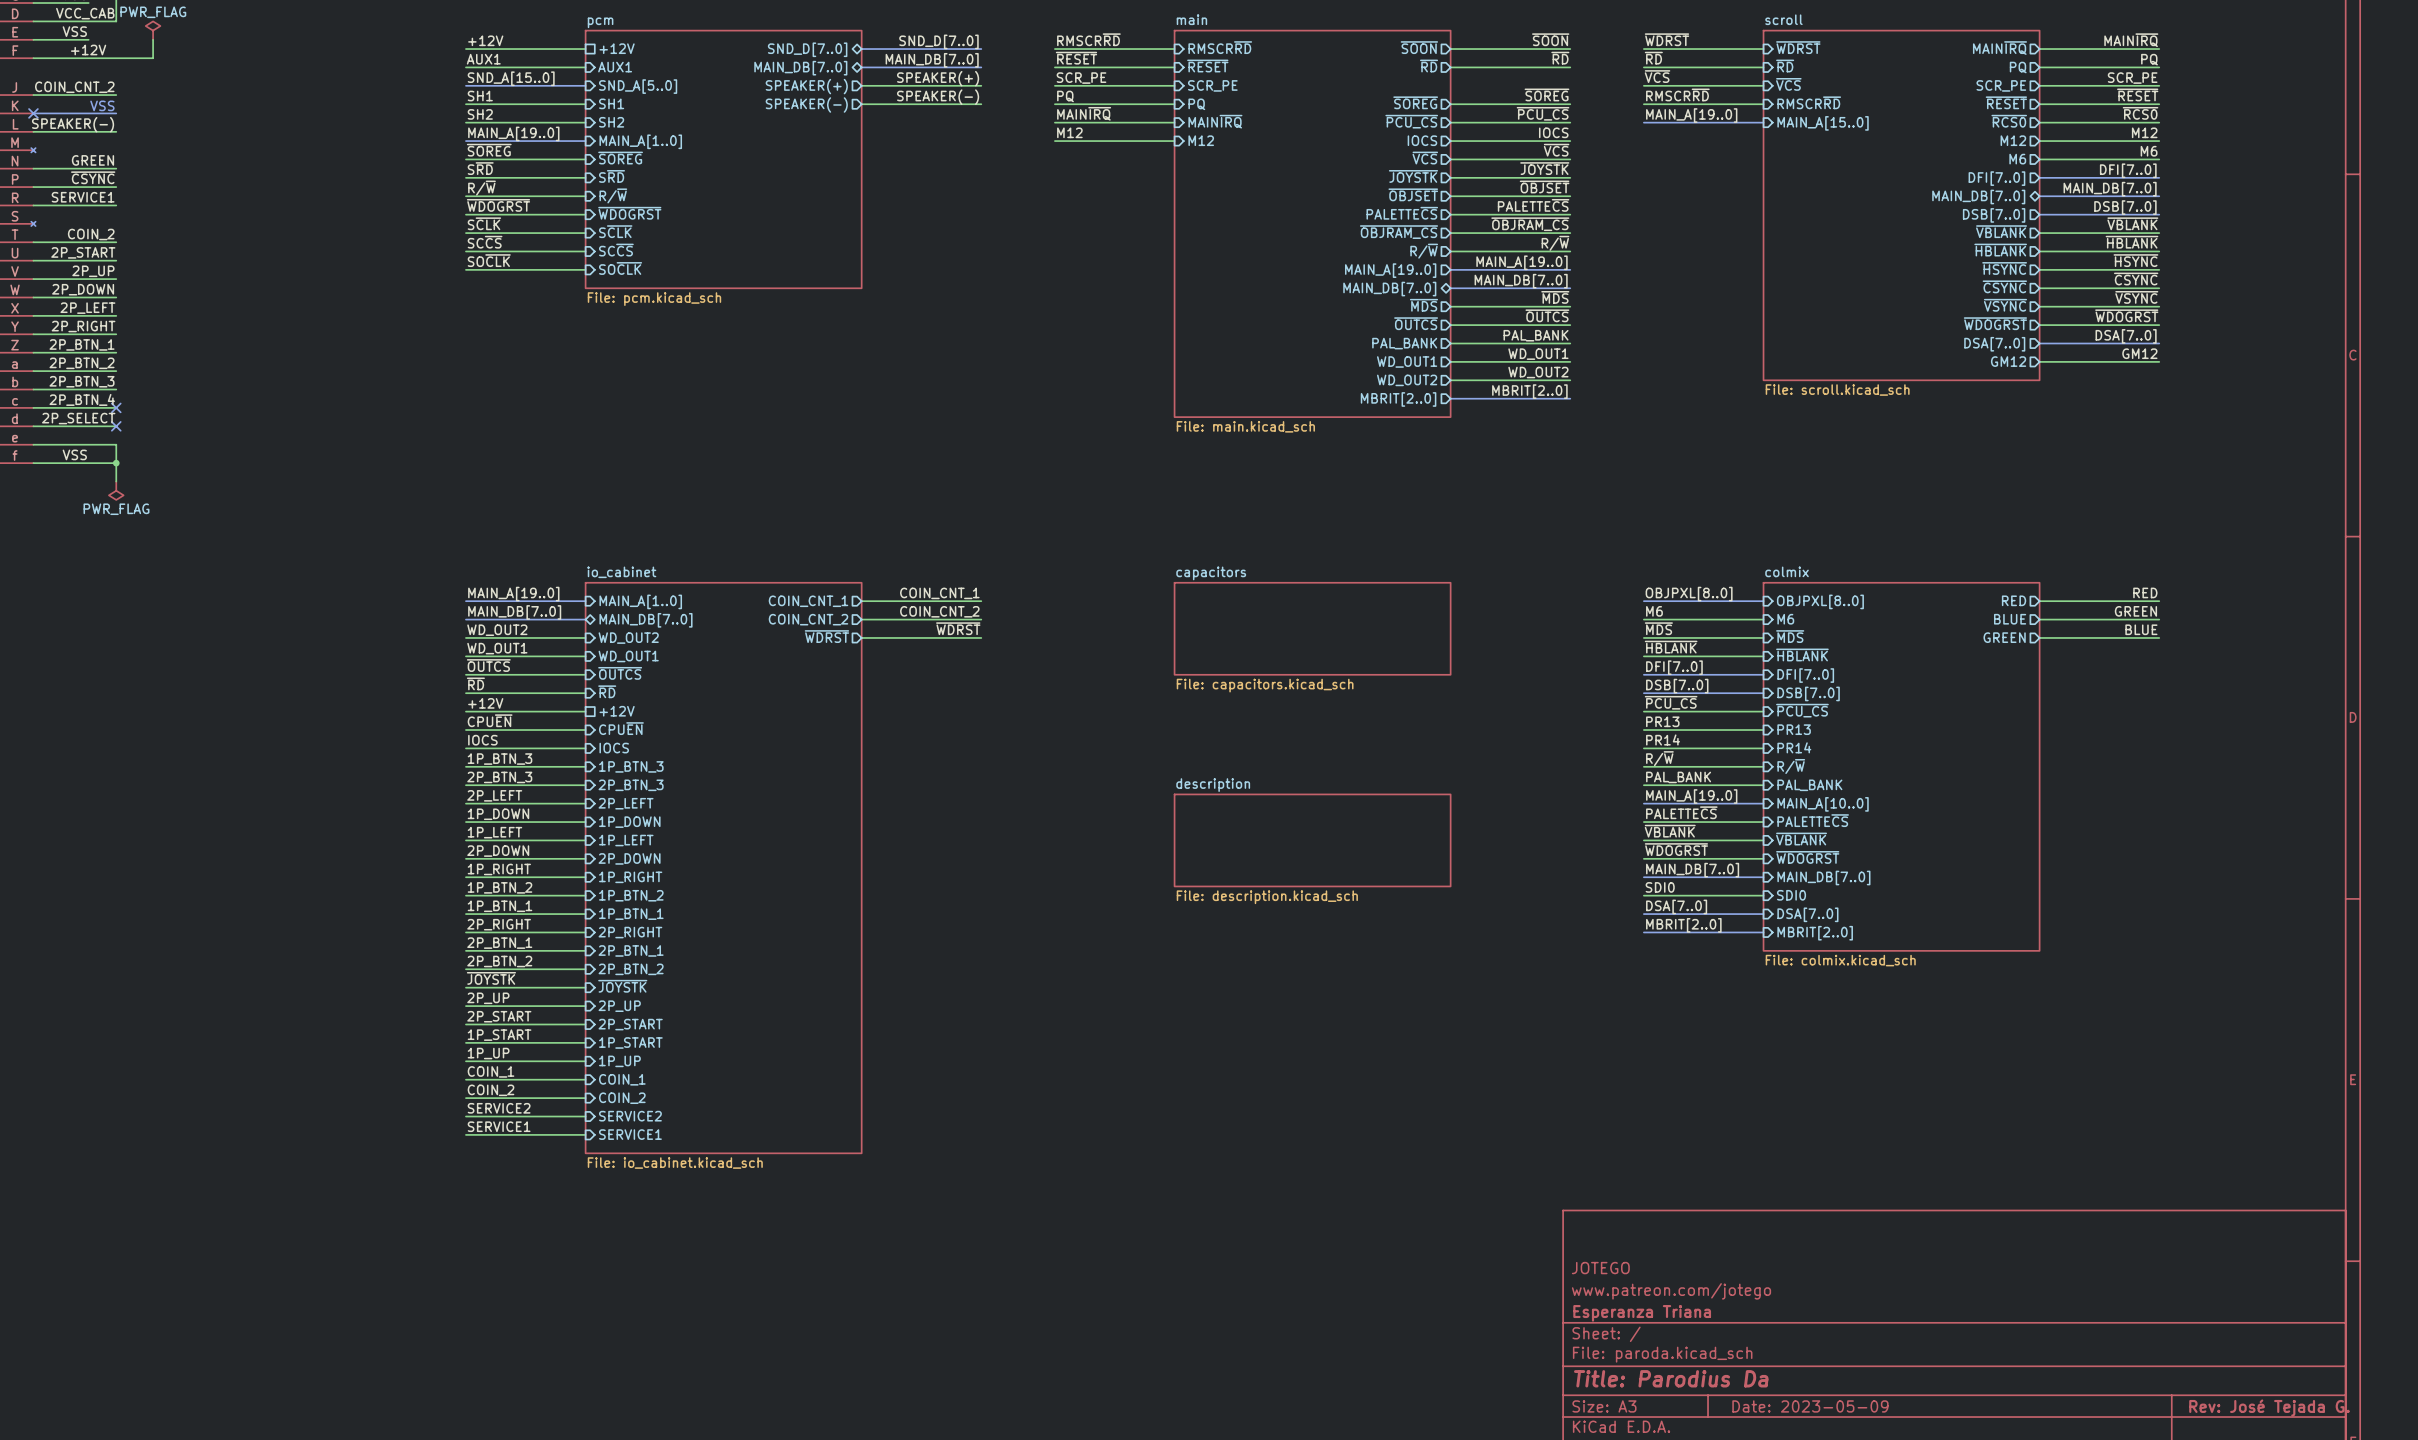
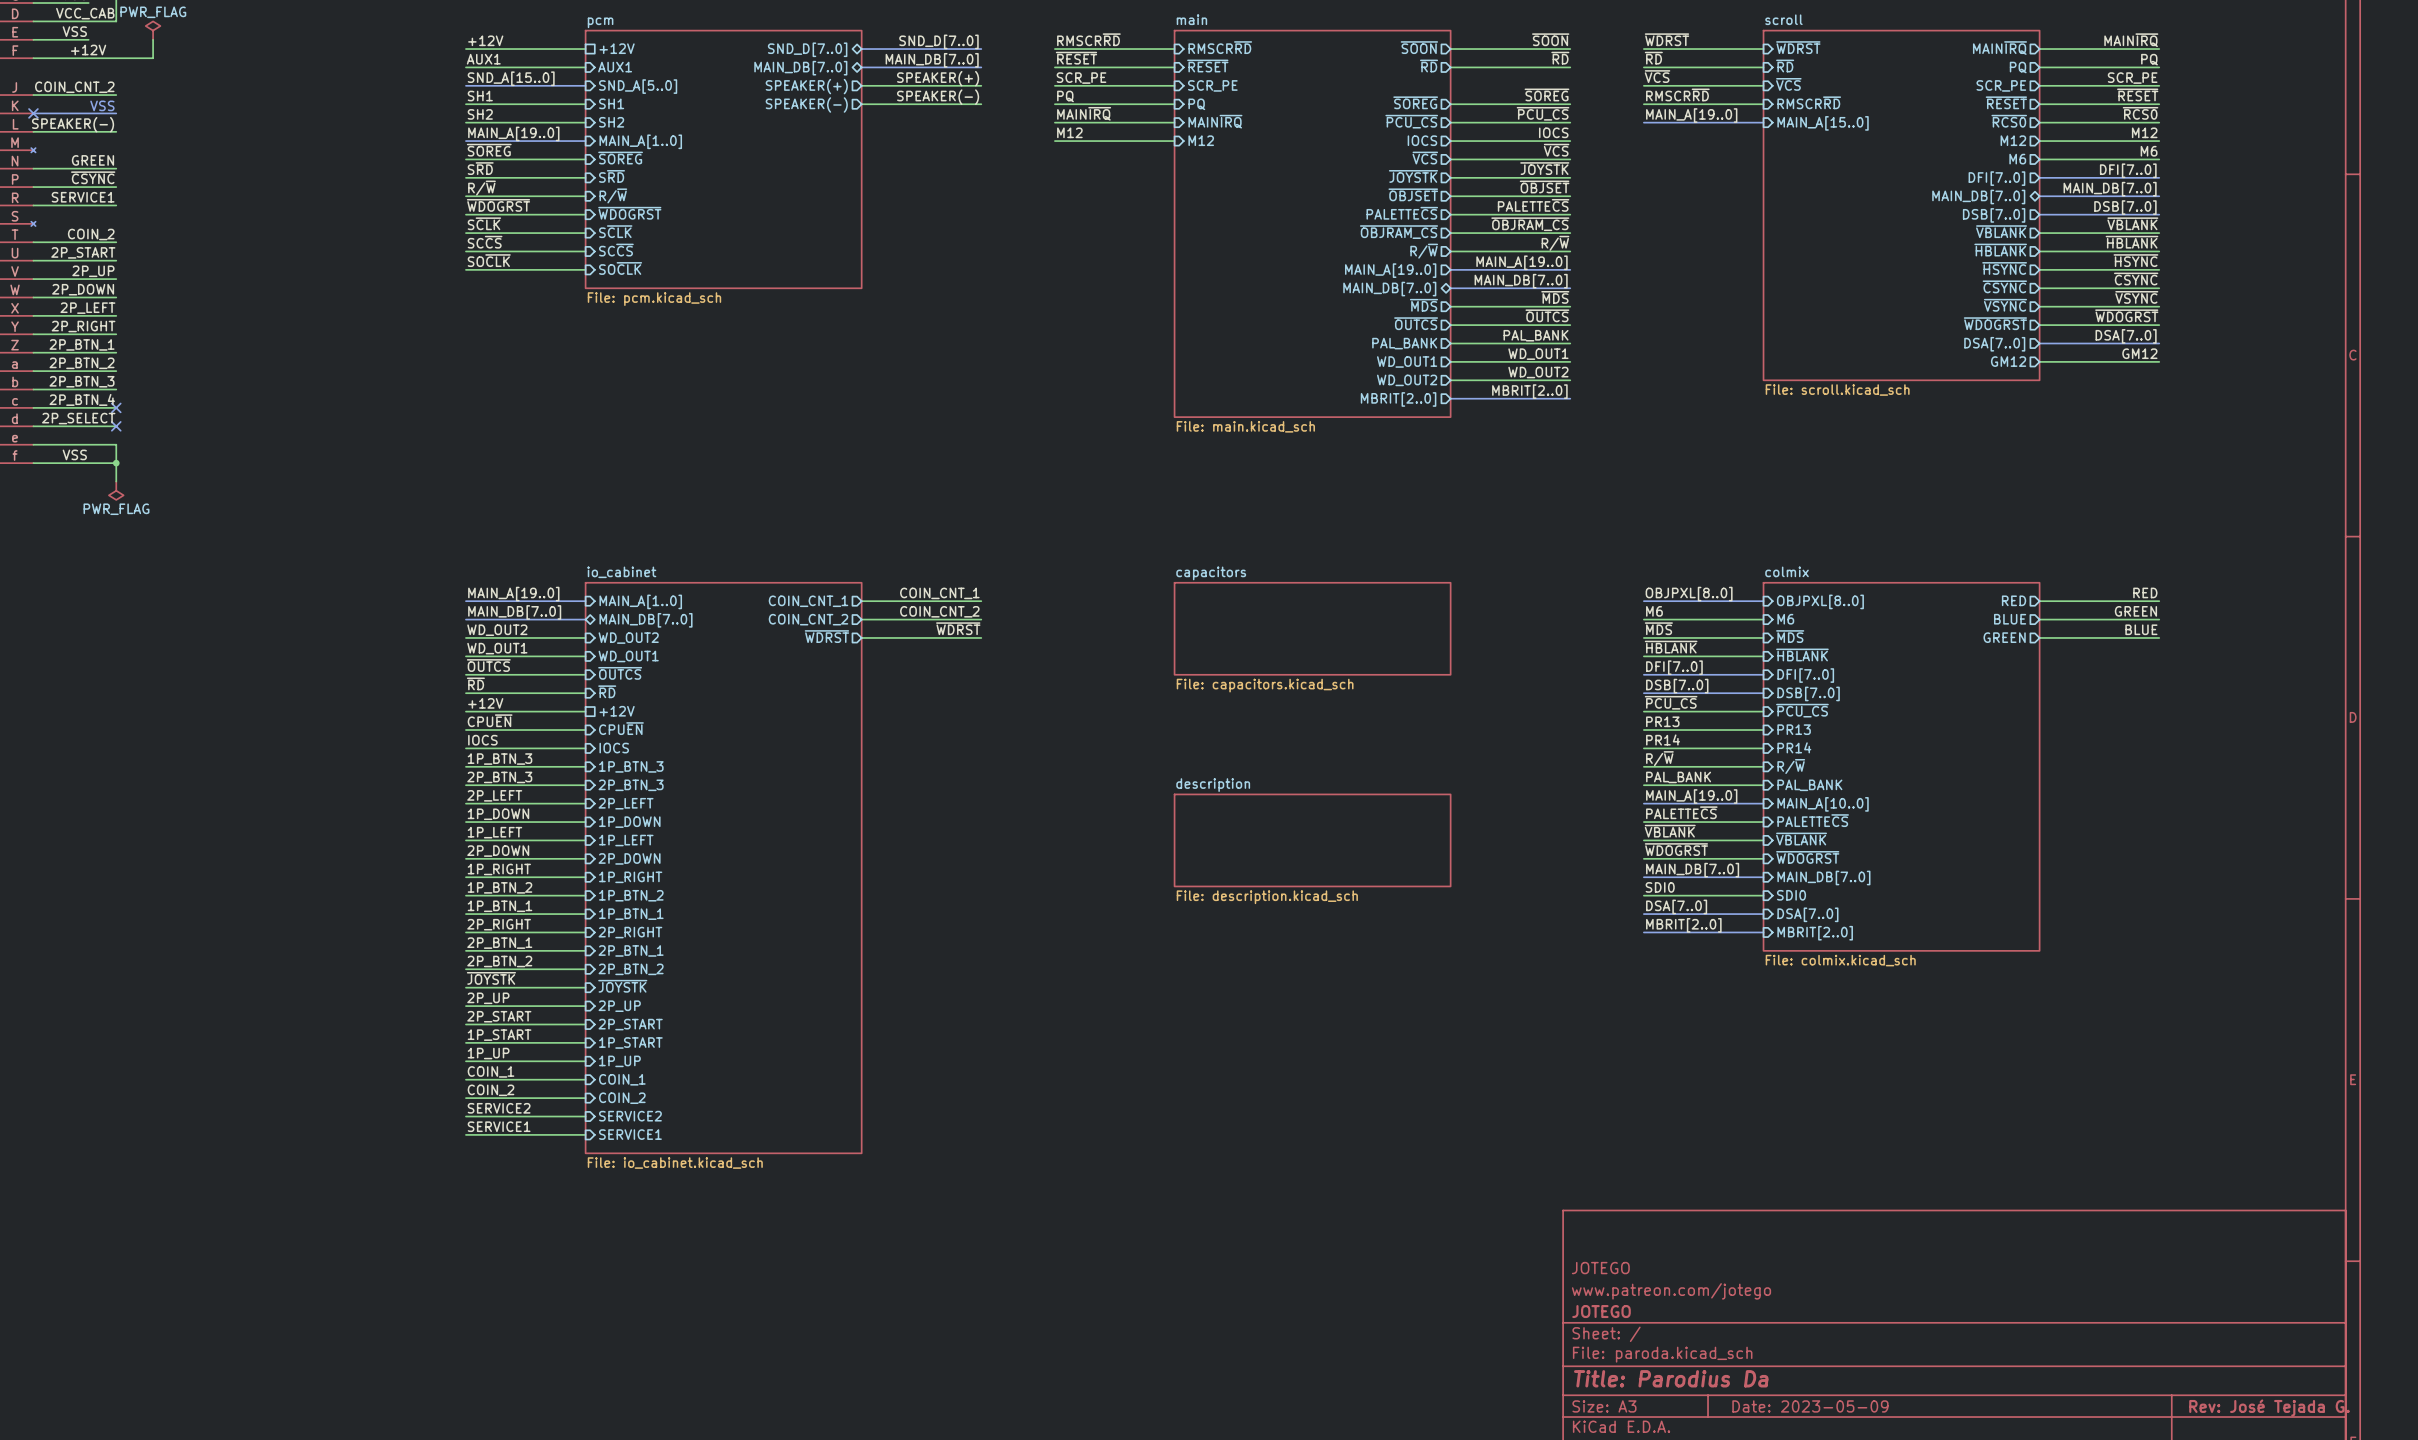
title block: Esperanza Triana (1642, 1313) -> JOTEGO (1601, 1311)

